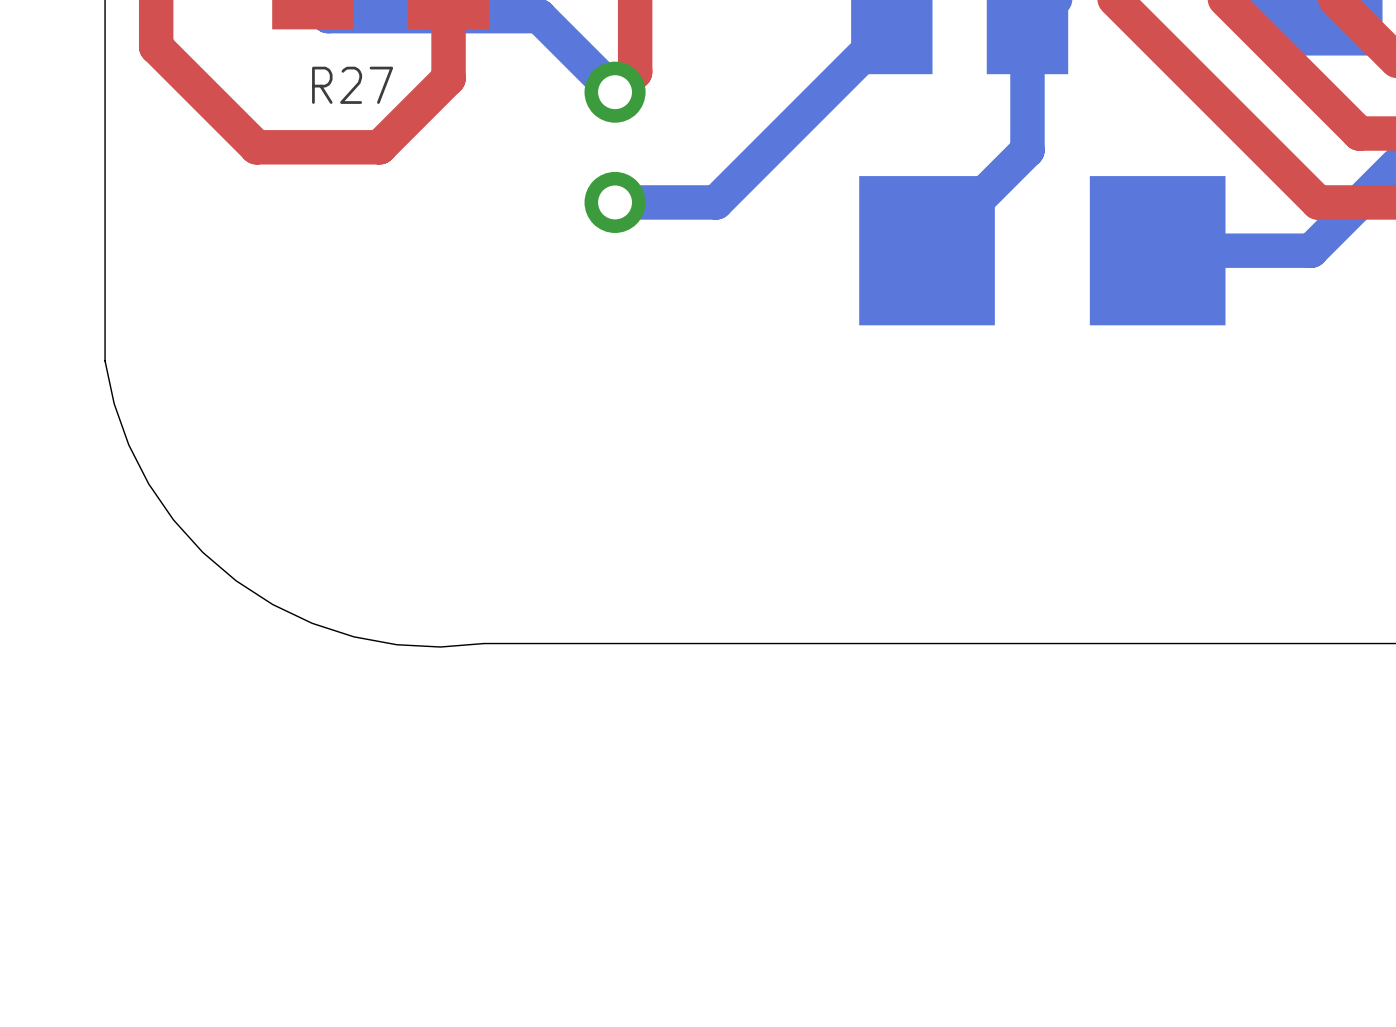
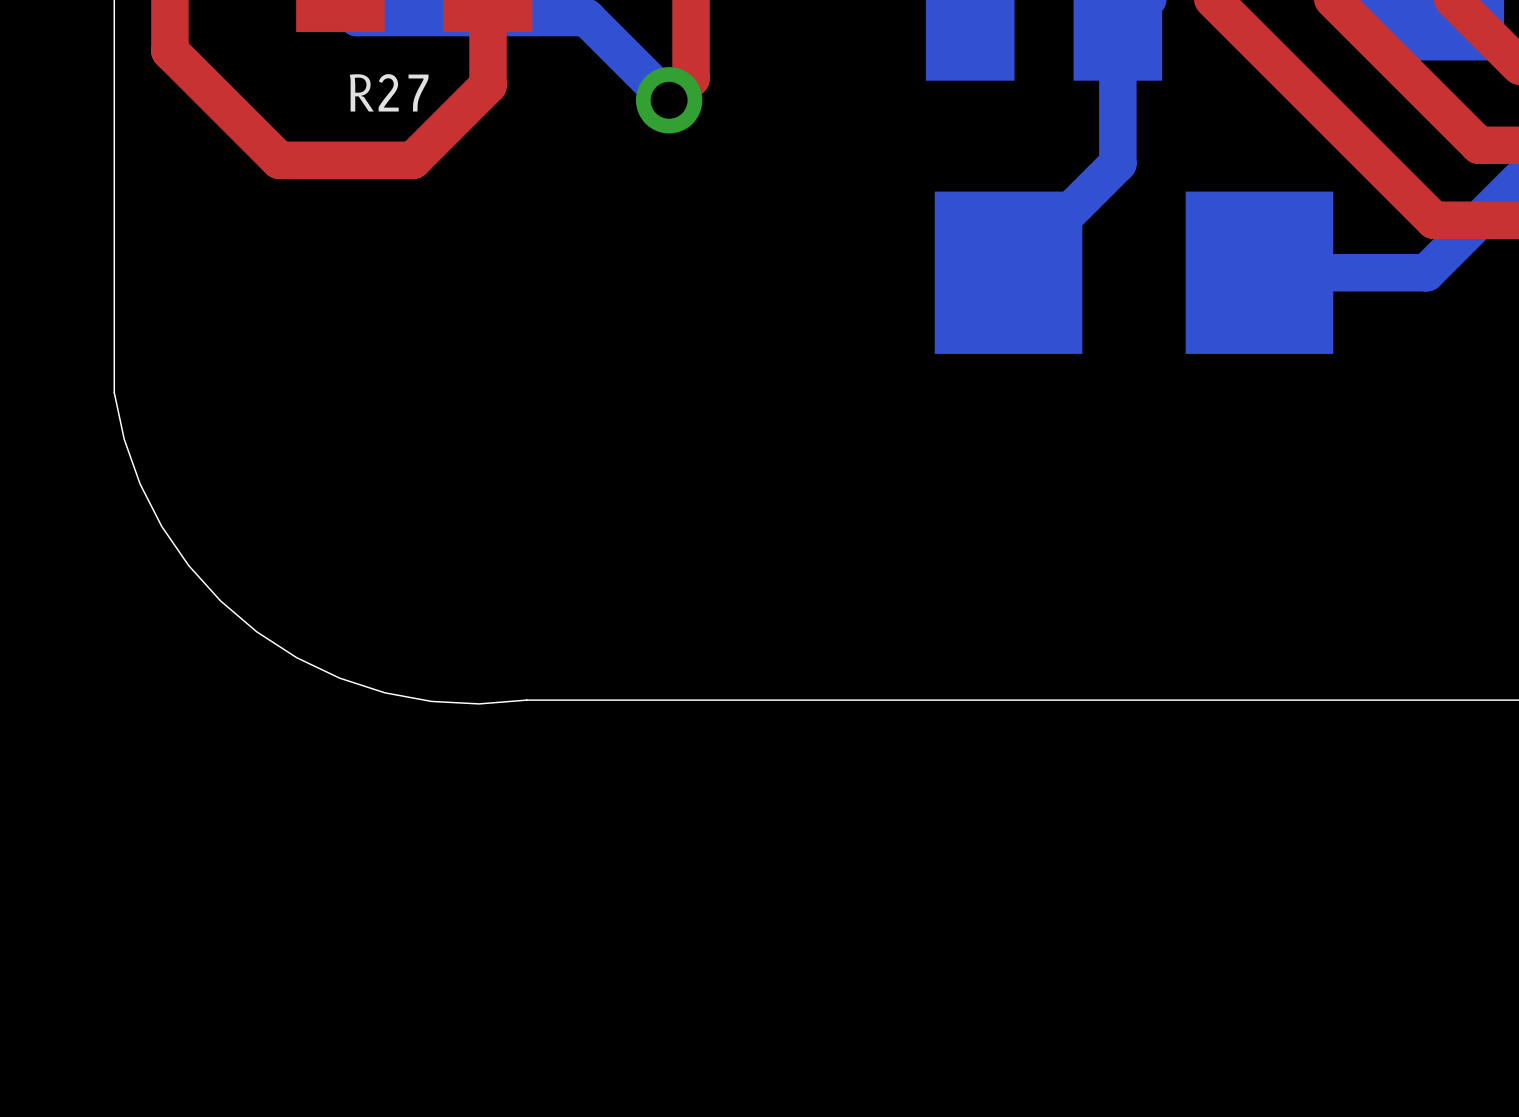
bottom track: (891, 26) (716, 202) (615, 202) -> none
via: (615, 202) -> none

